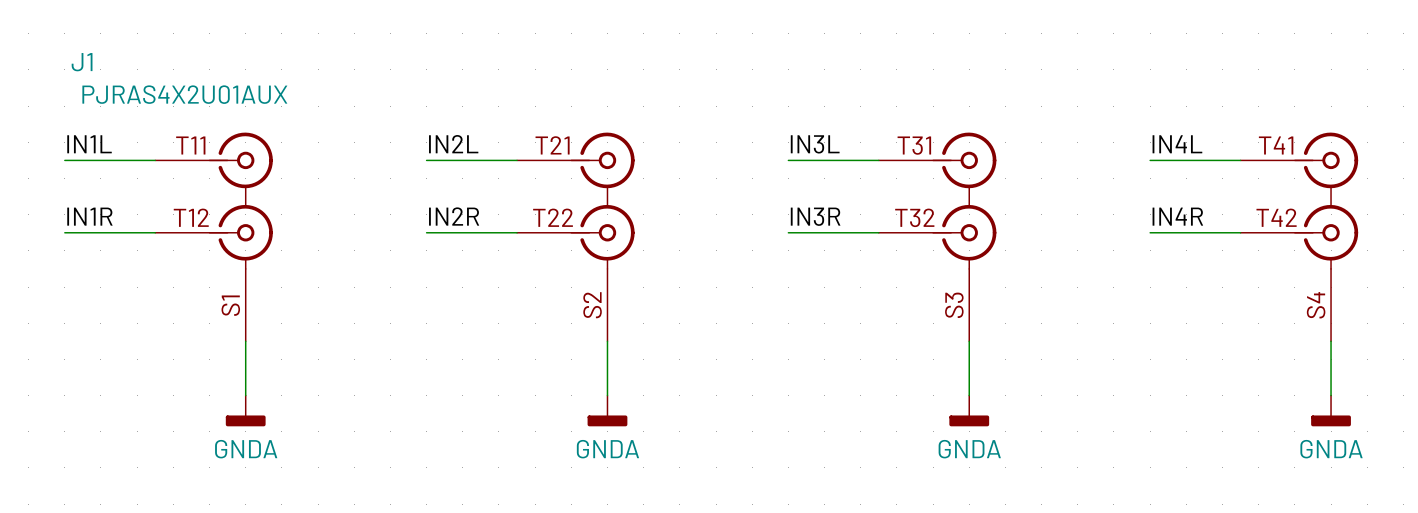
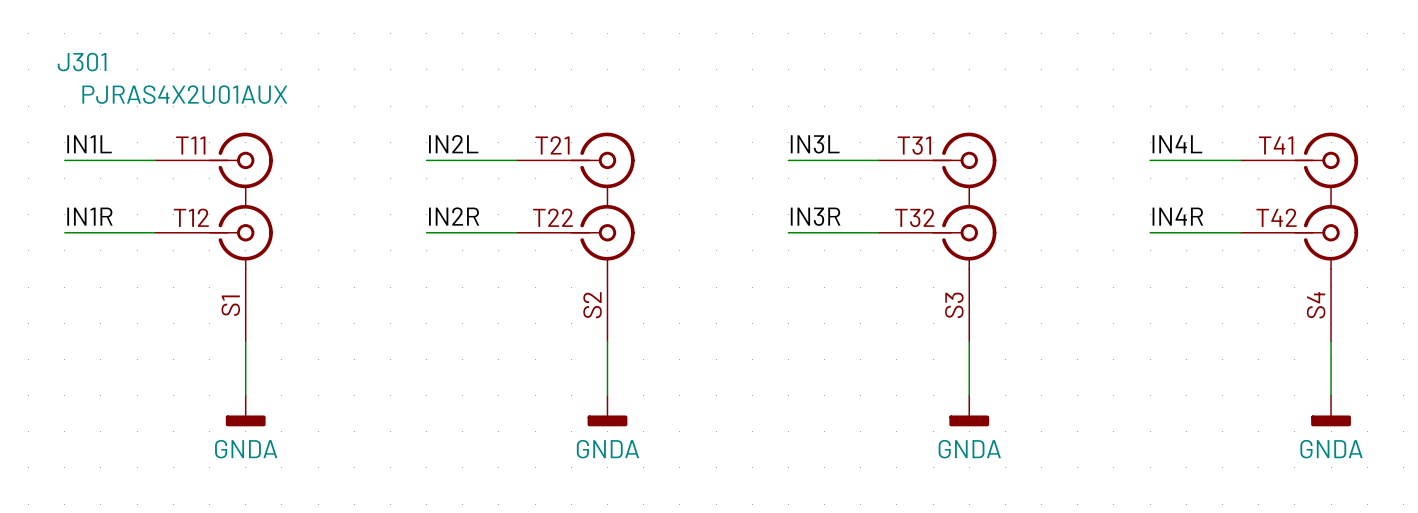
J1 name: J1 (82, 62) -> J301 (82, 62)

